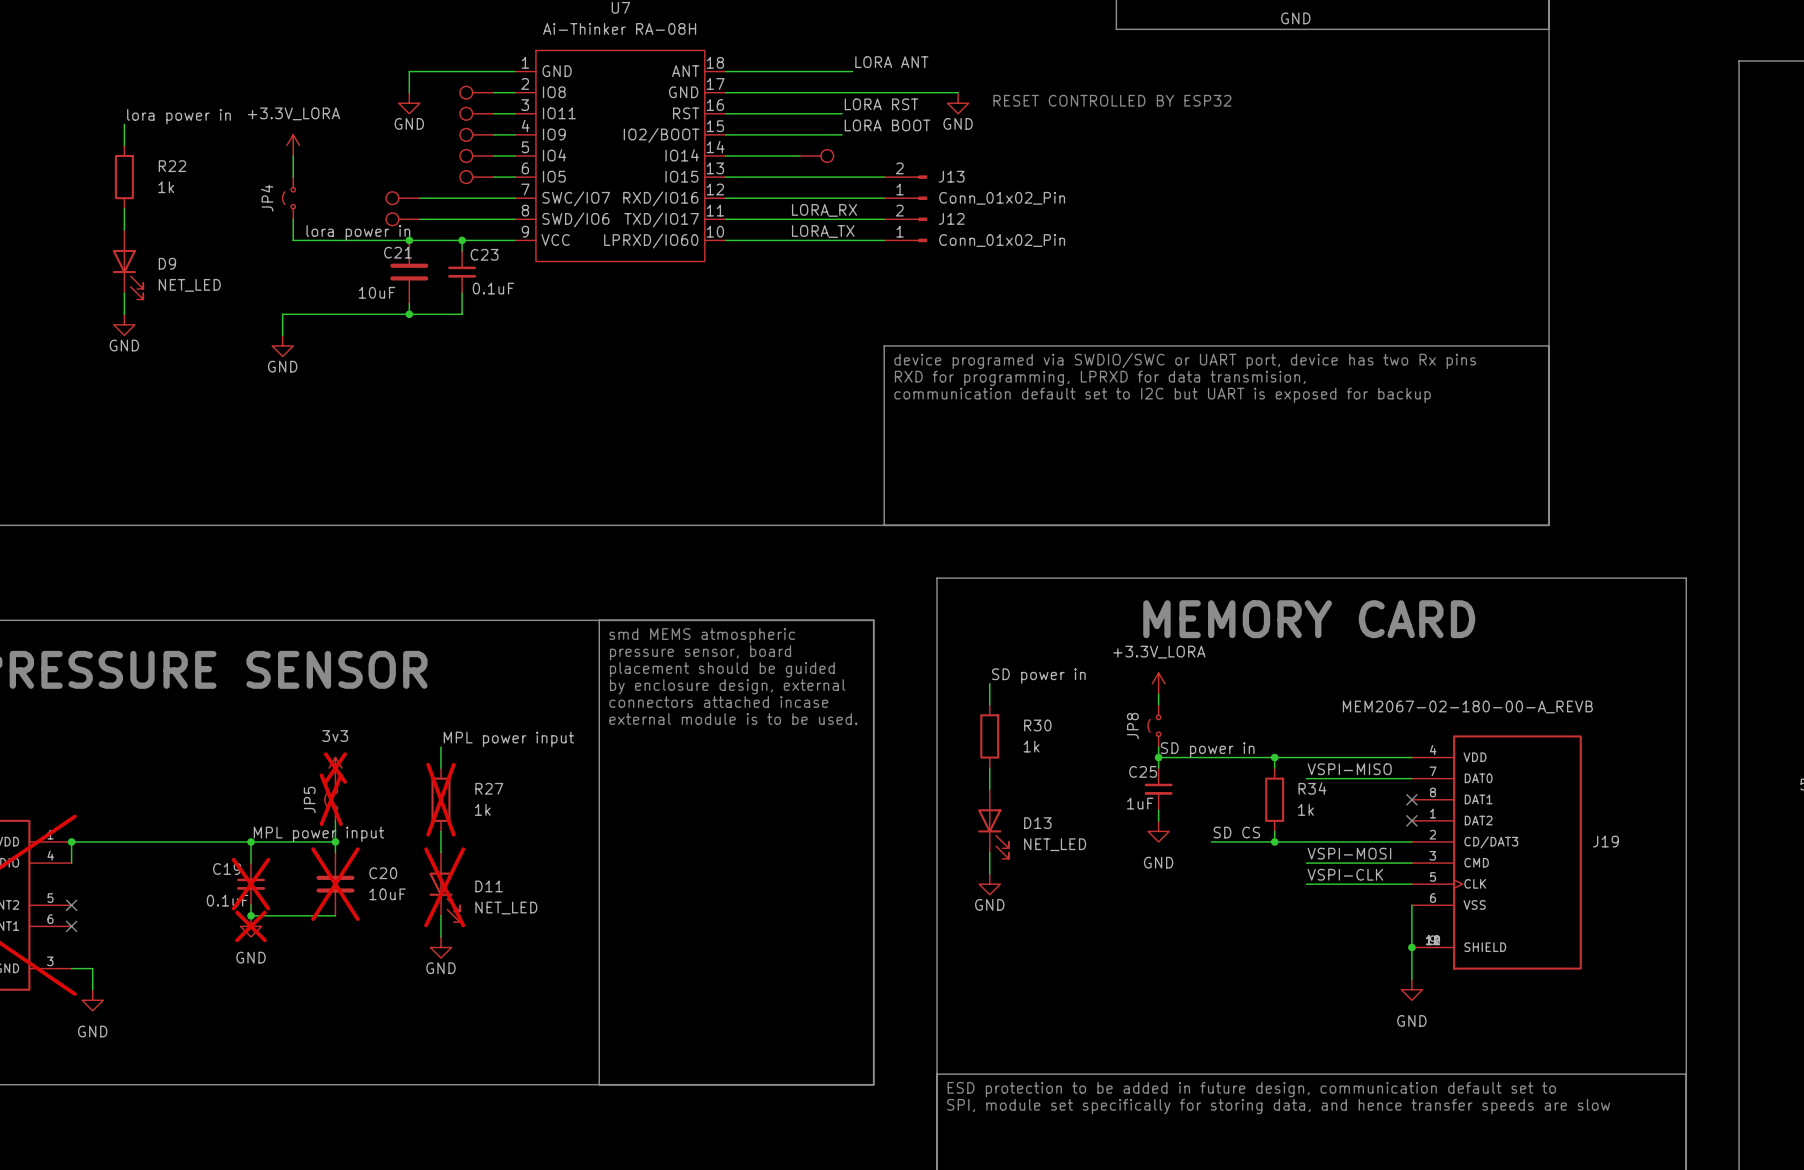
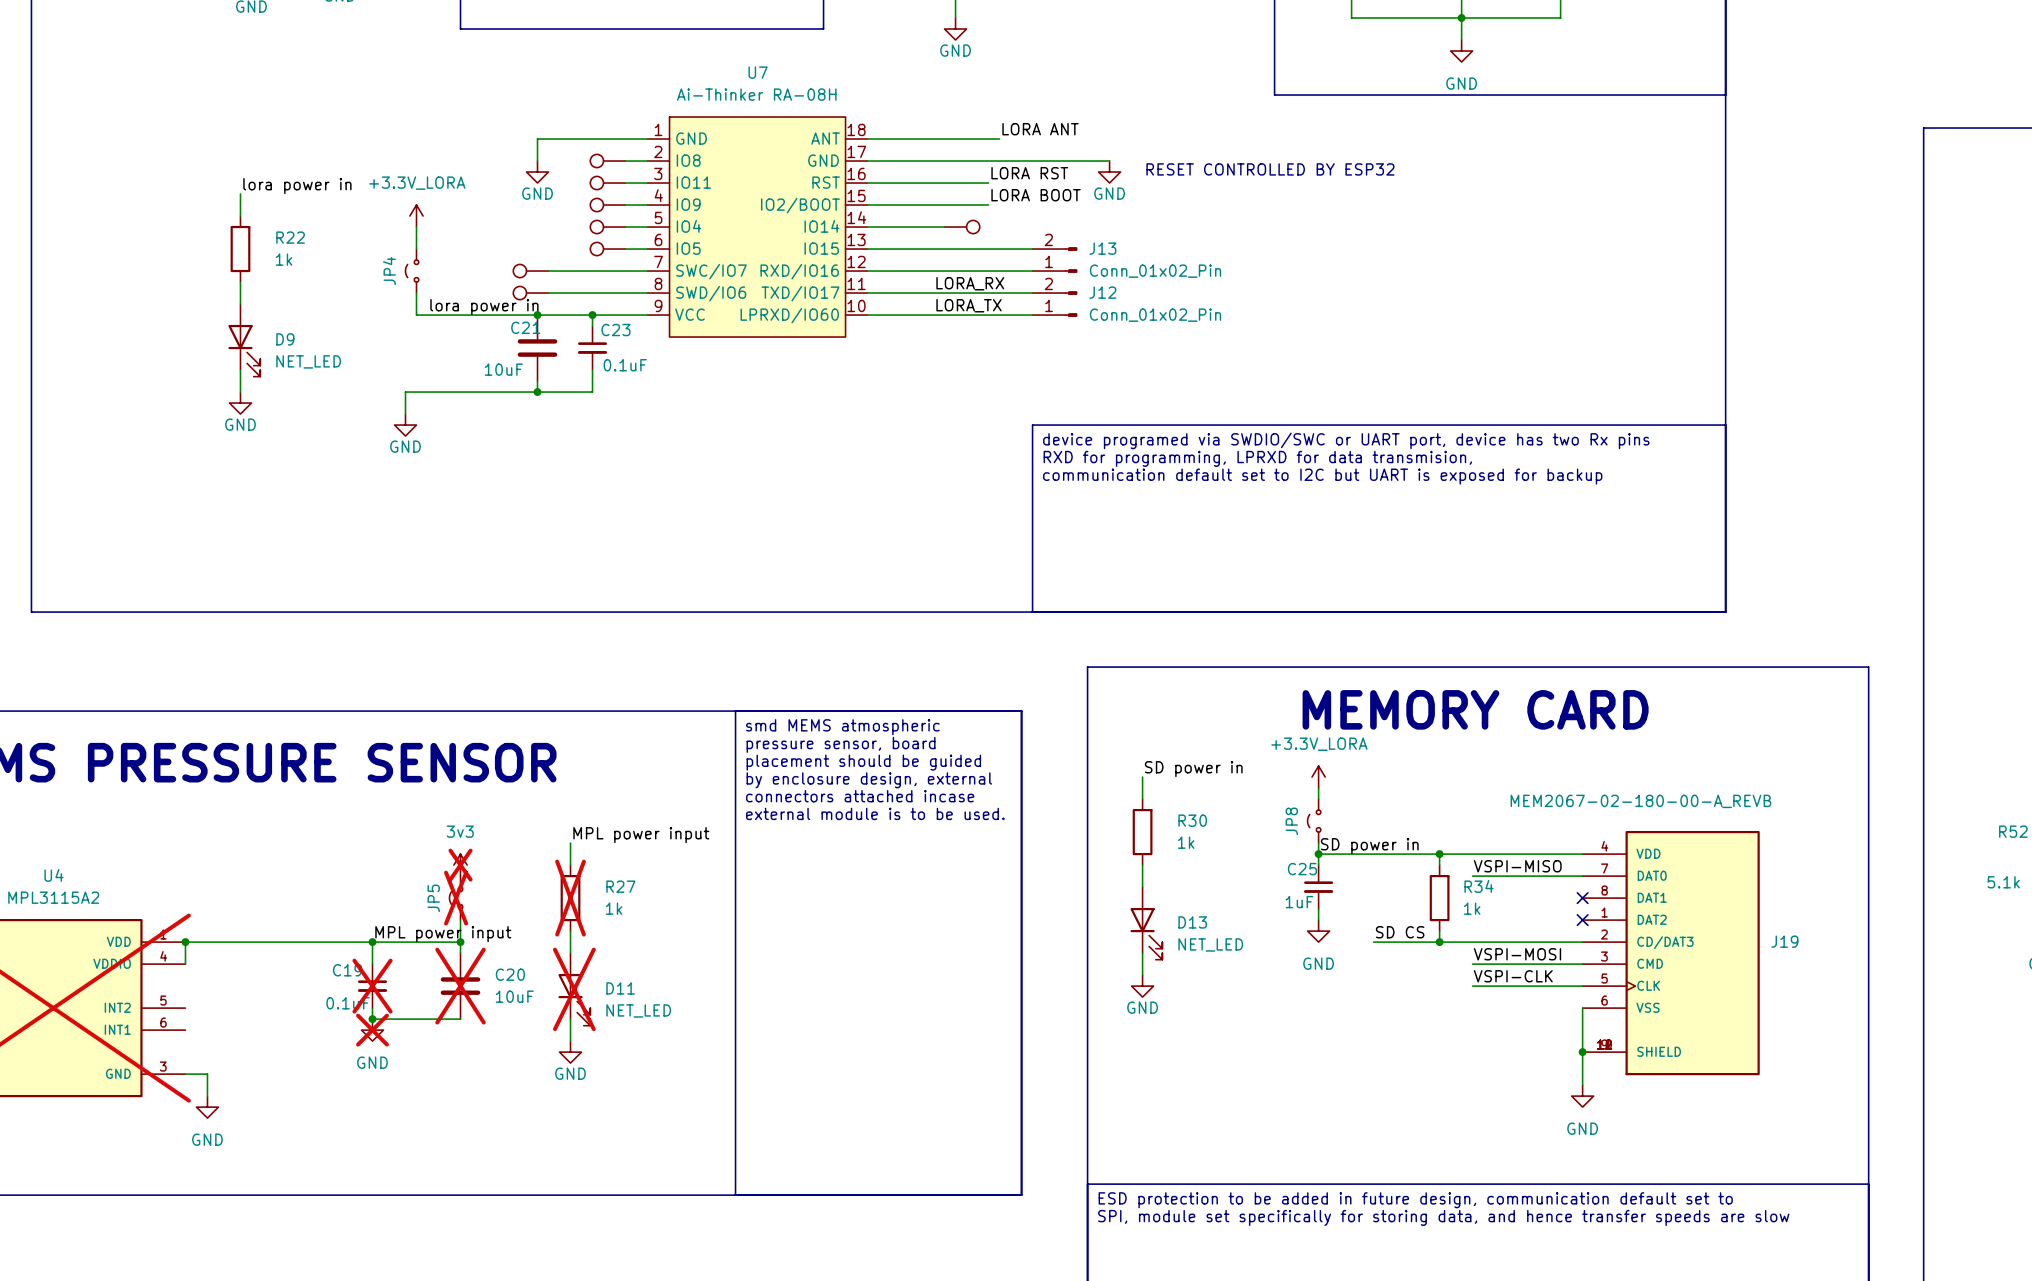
no-connect mark: (71, 905) -> none
no-connect mark: (71, 926) -> none

